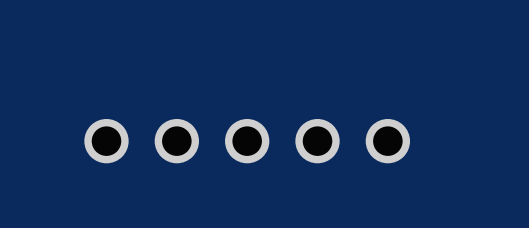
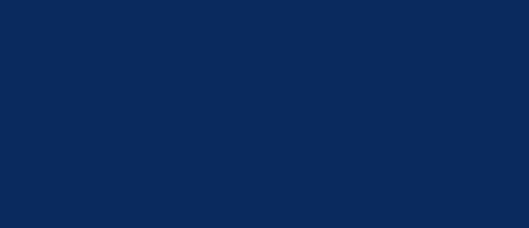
part: (247, 141) -> none

